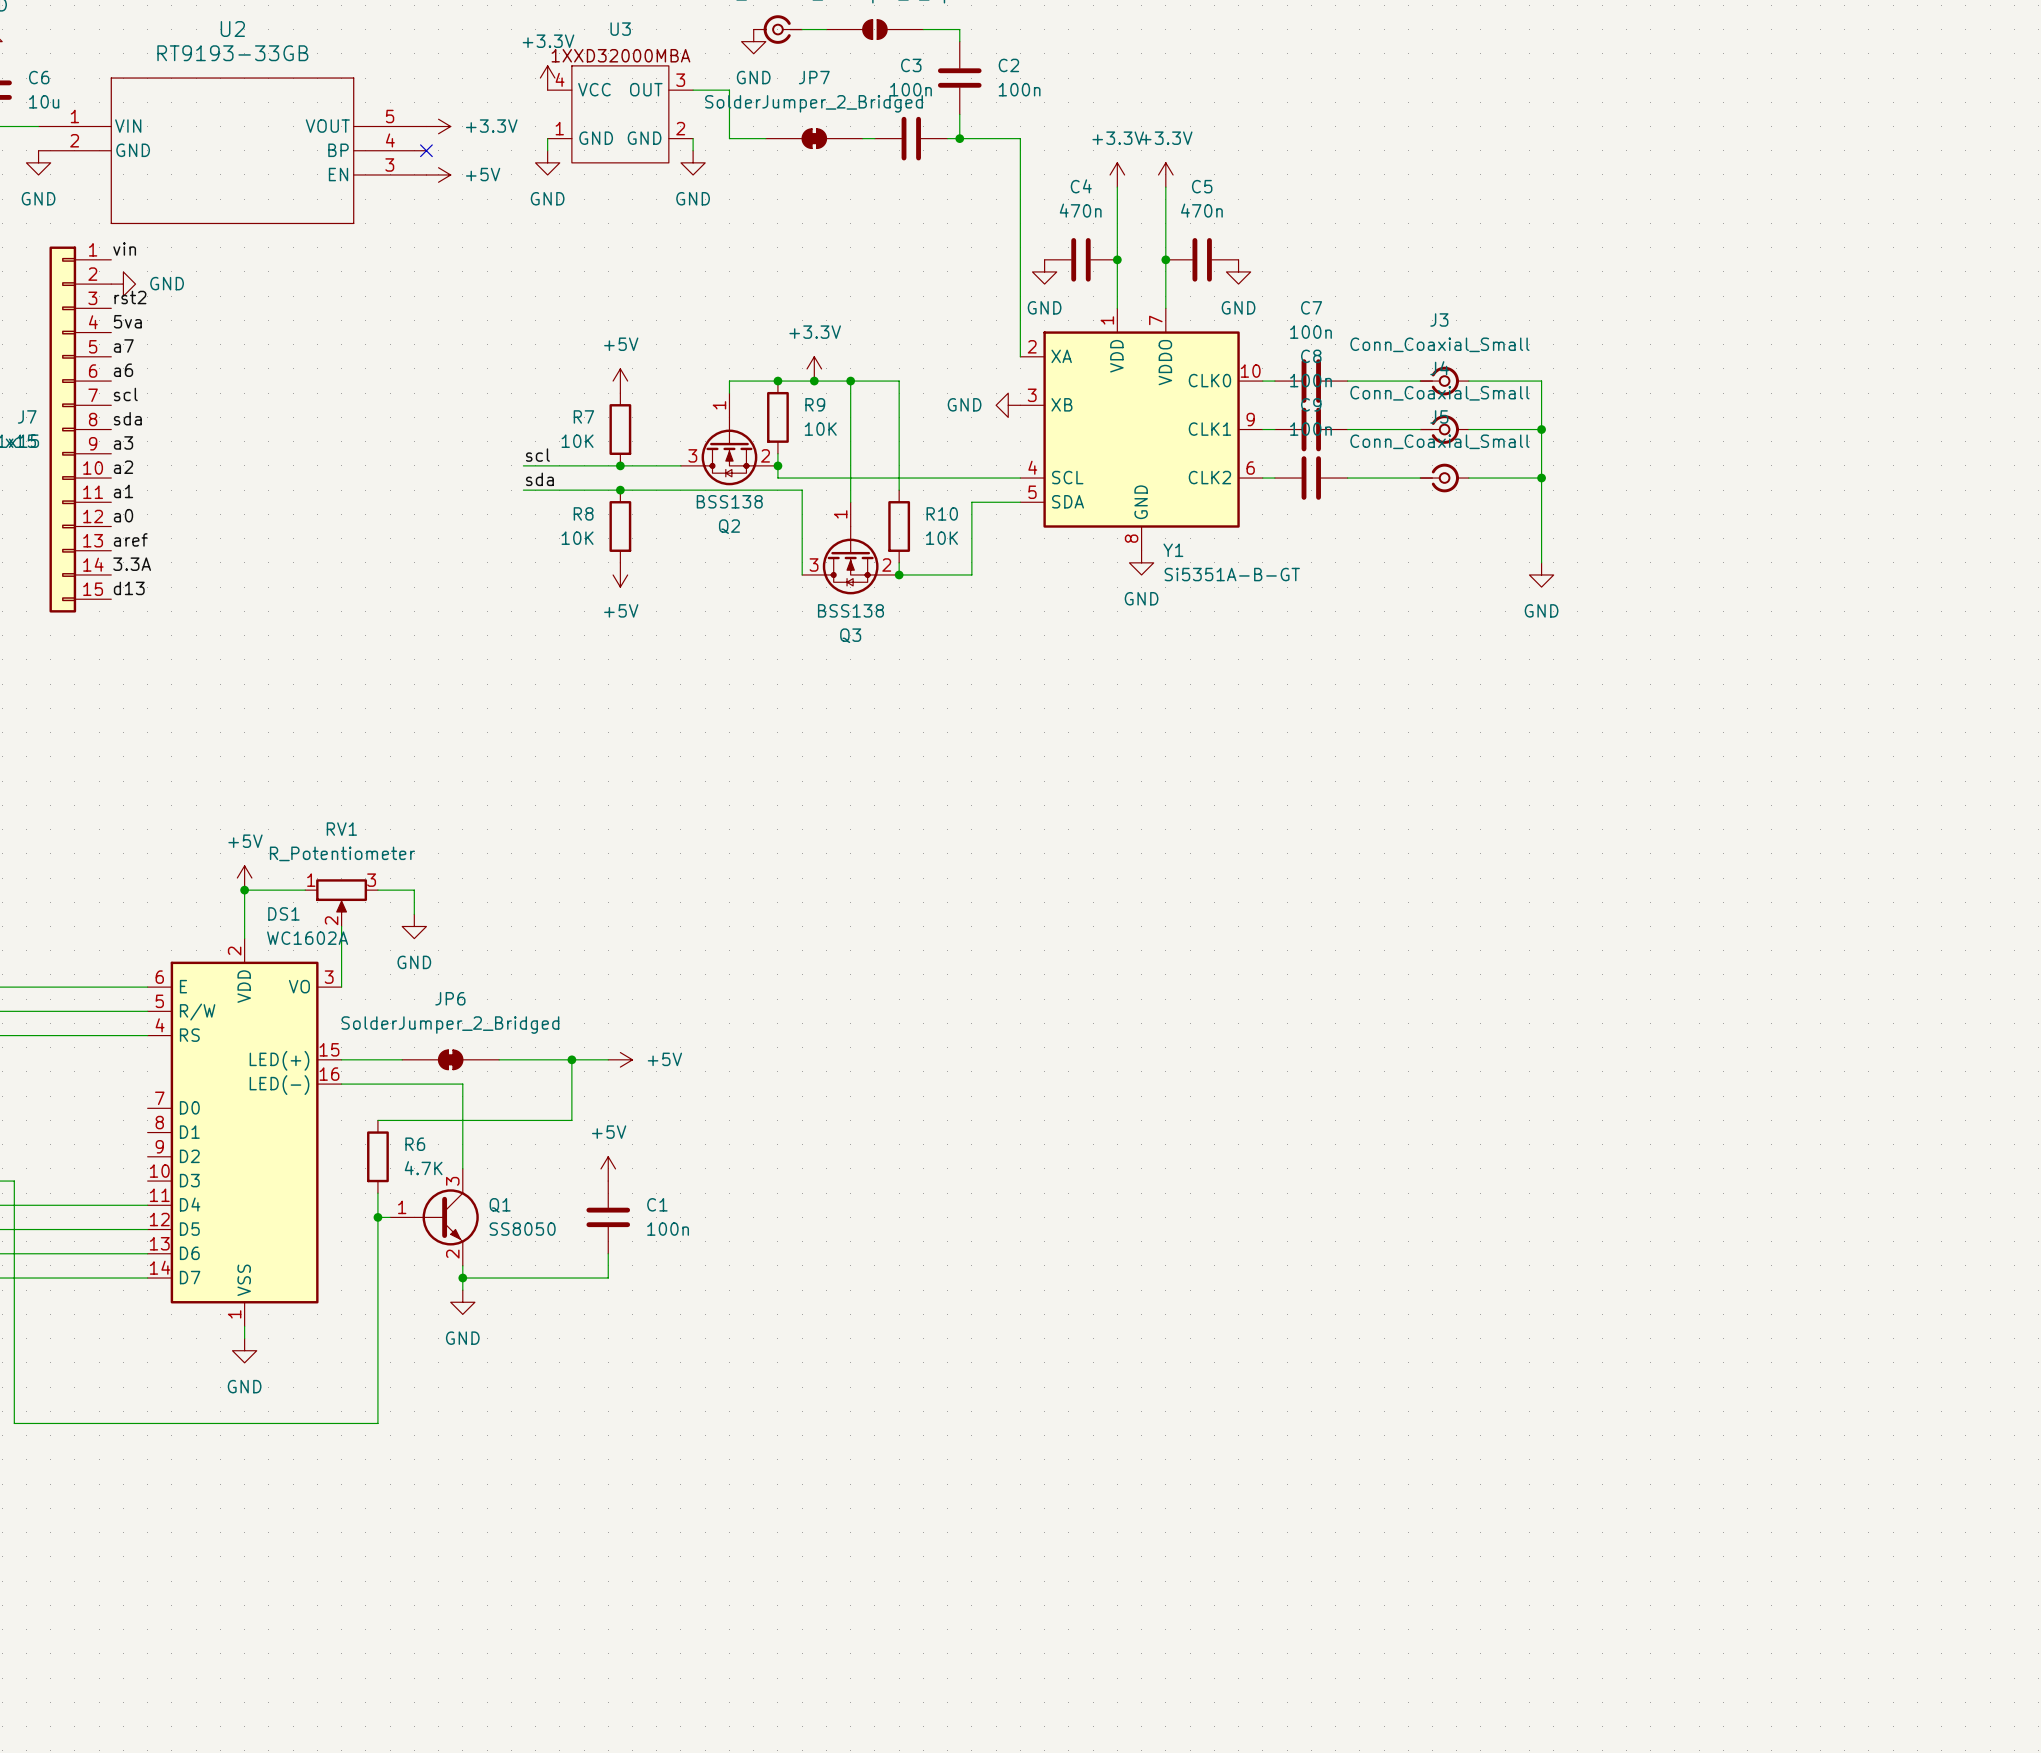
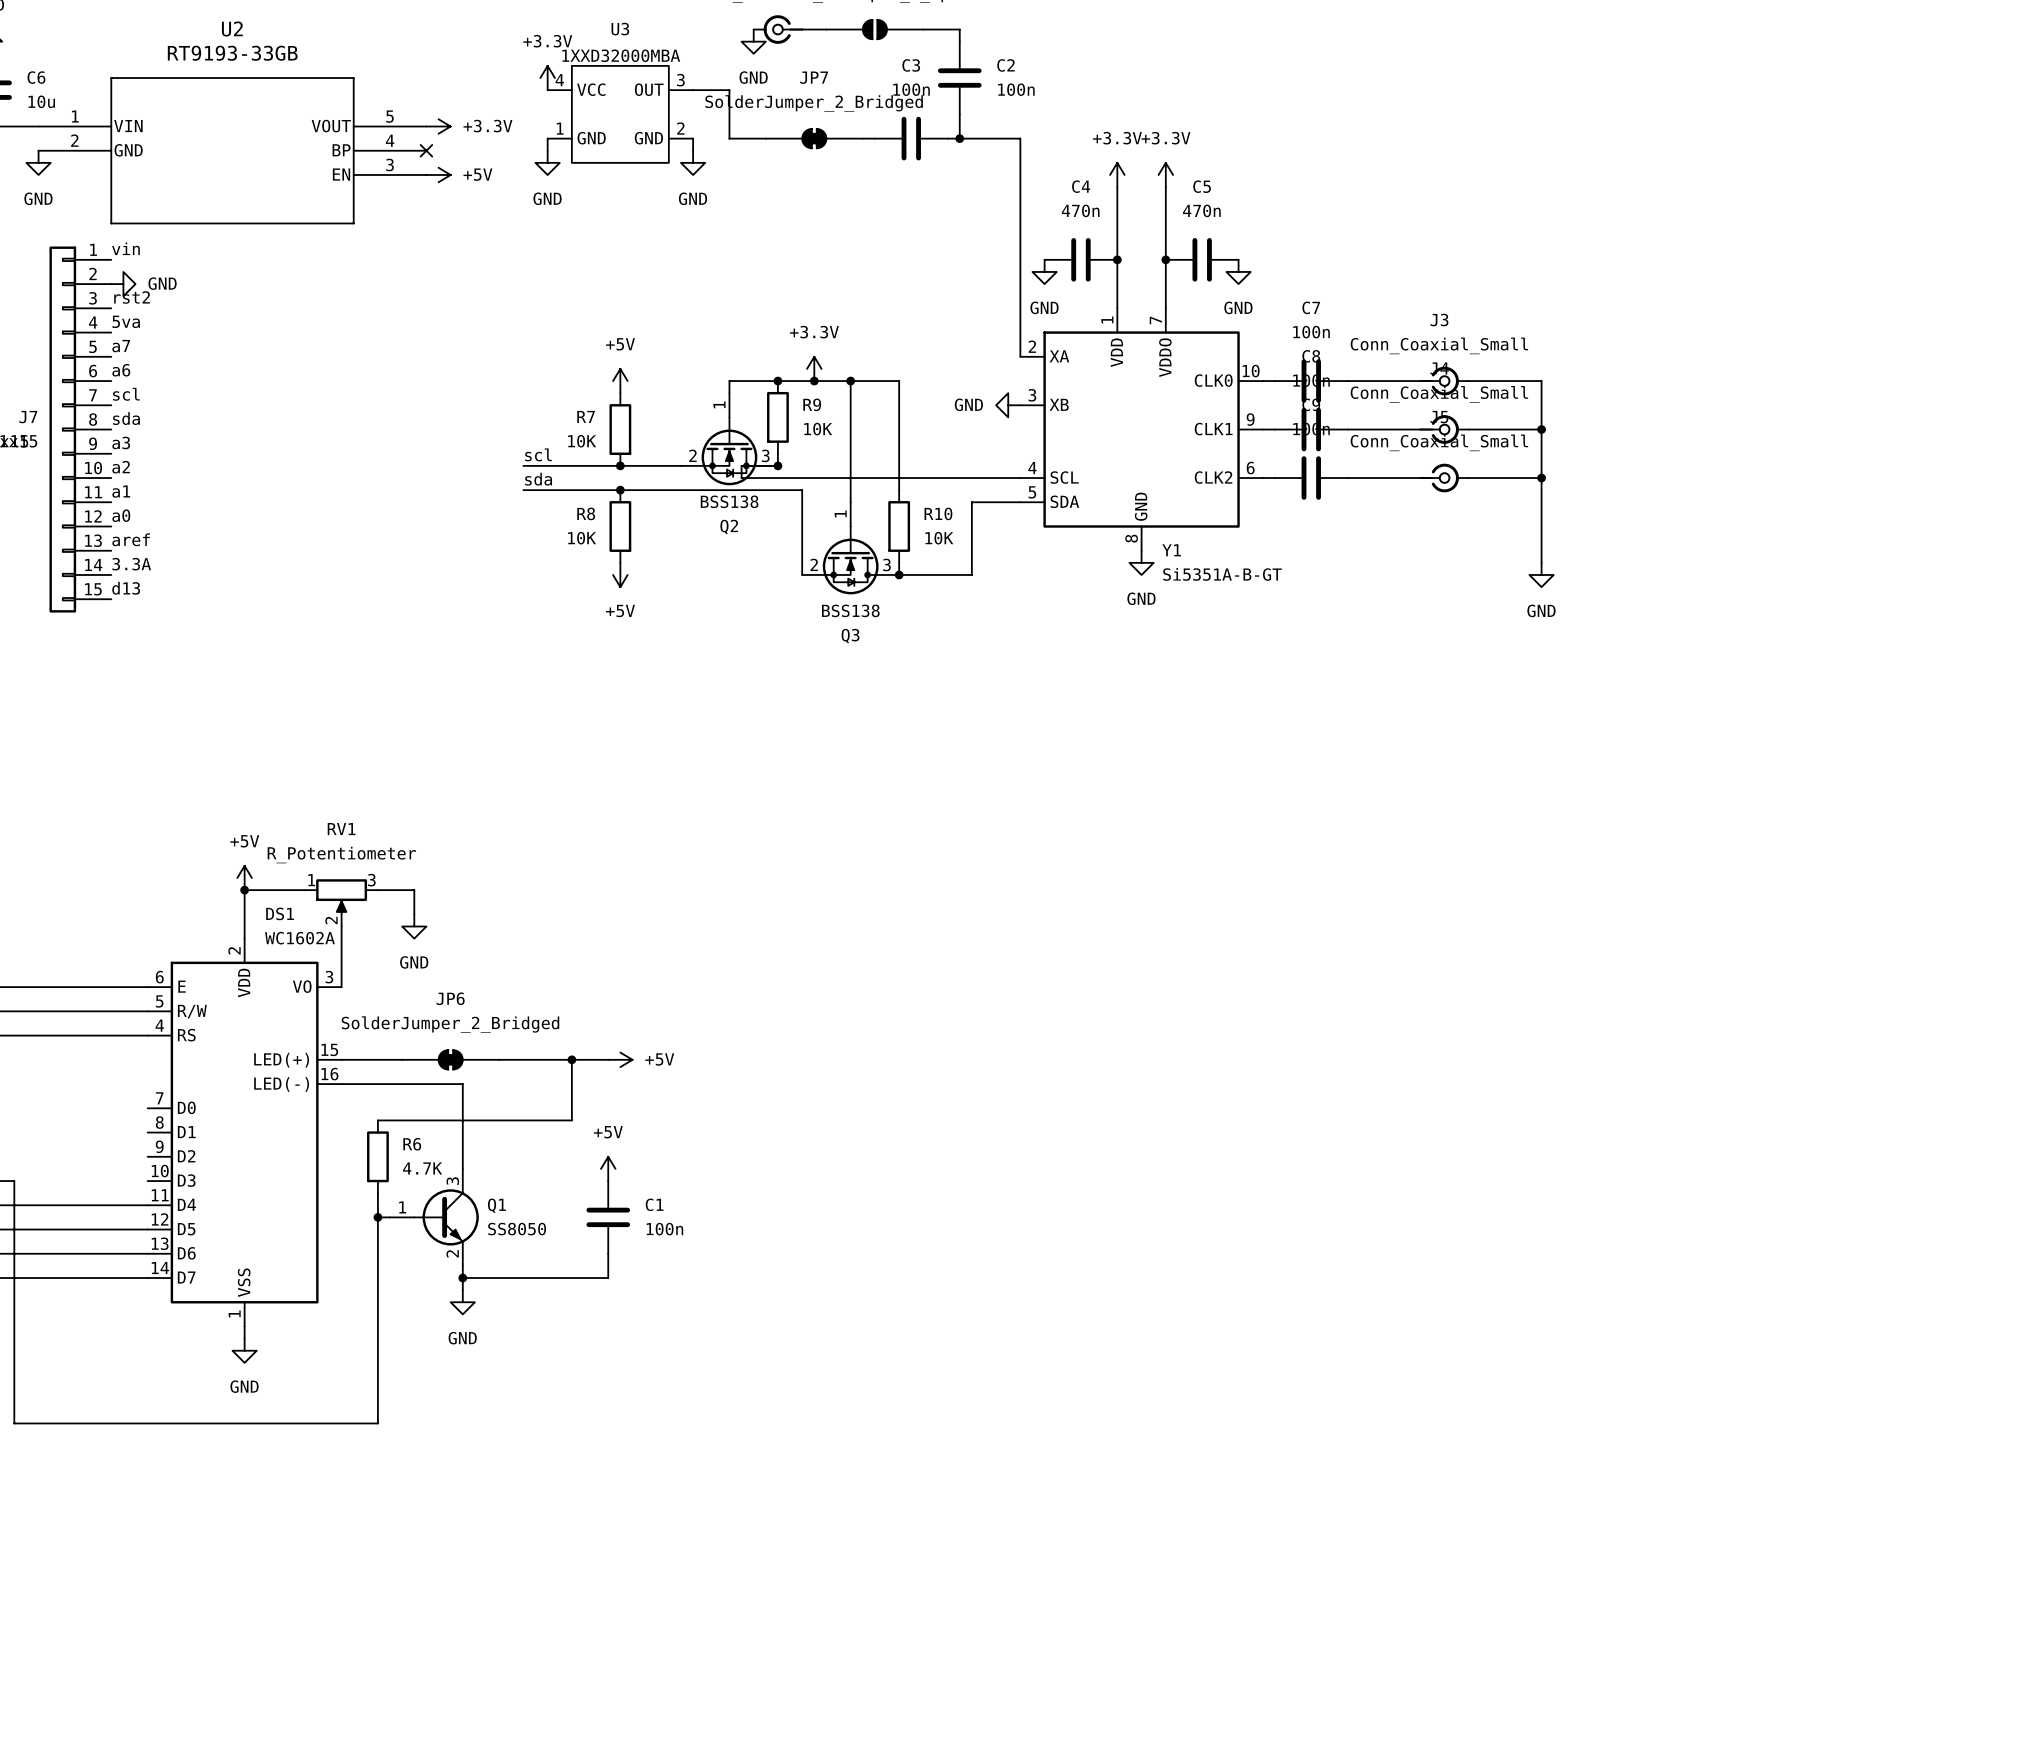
Q2 flip: as is (729, 451) -> left-right (729, 451)
wire: (777, 465) (777, 478) -> (777, 465) (741, 465) (741, 478) (777, 478)
Q3 flip: as is (850, 560) -> left-right (850, 560)

